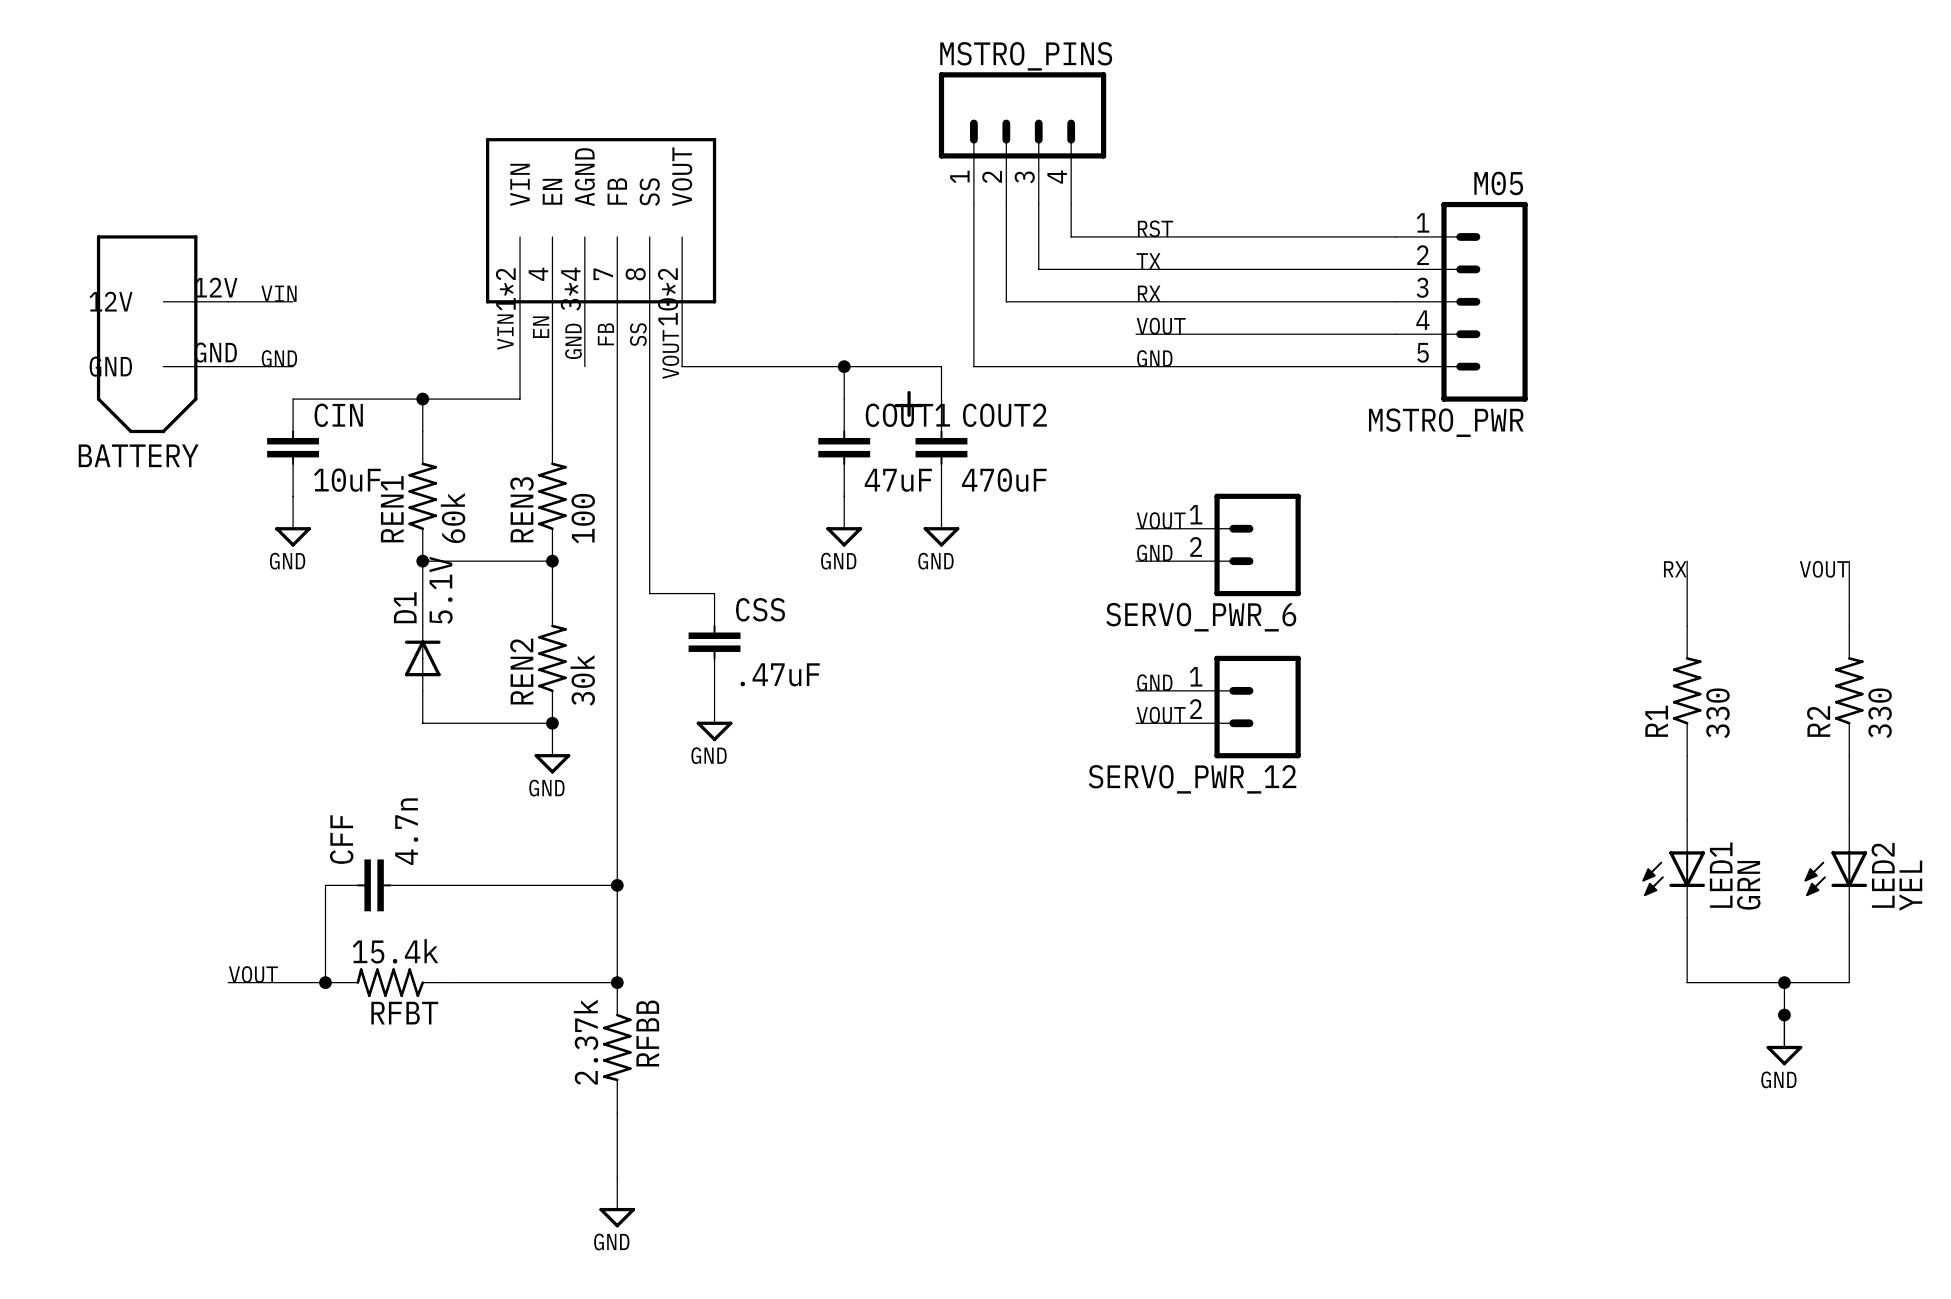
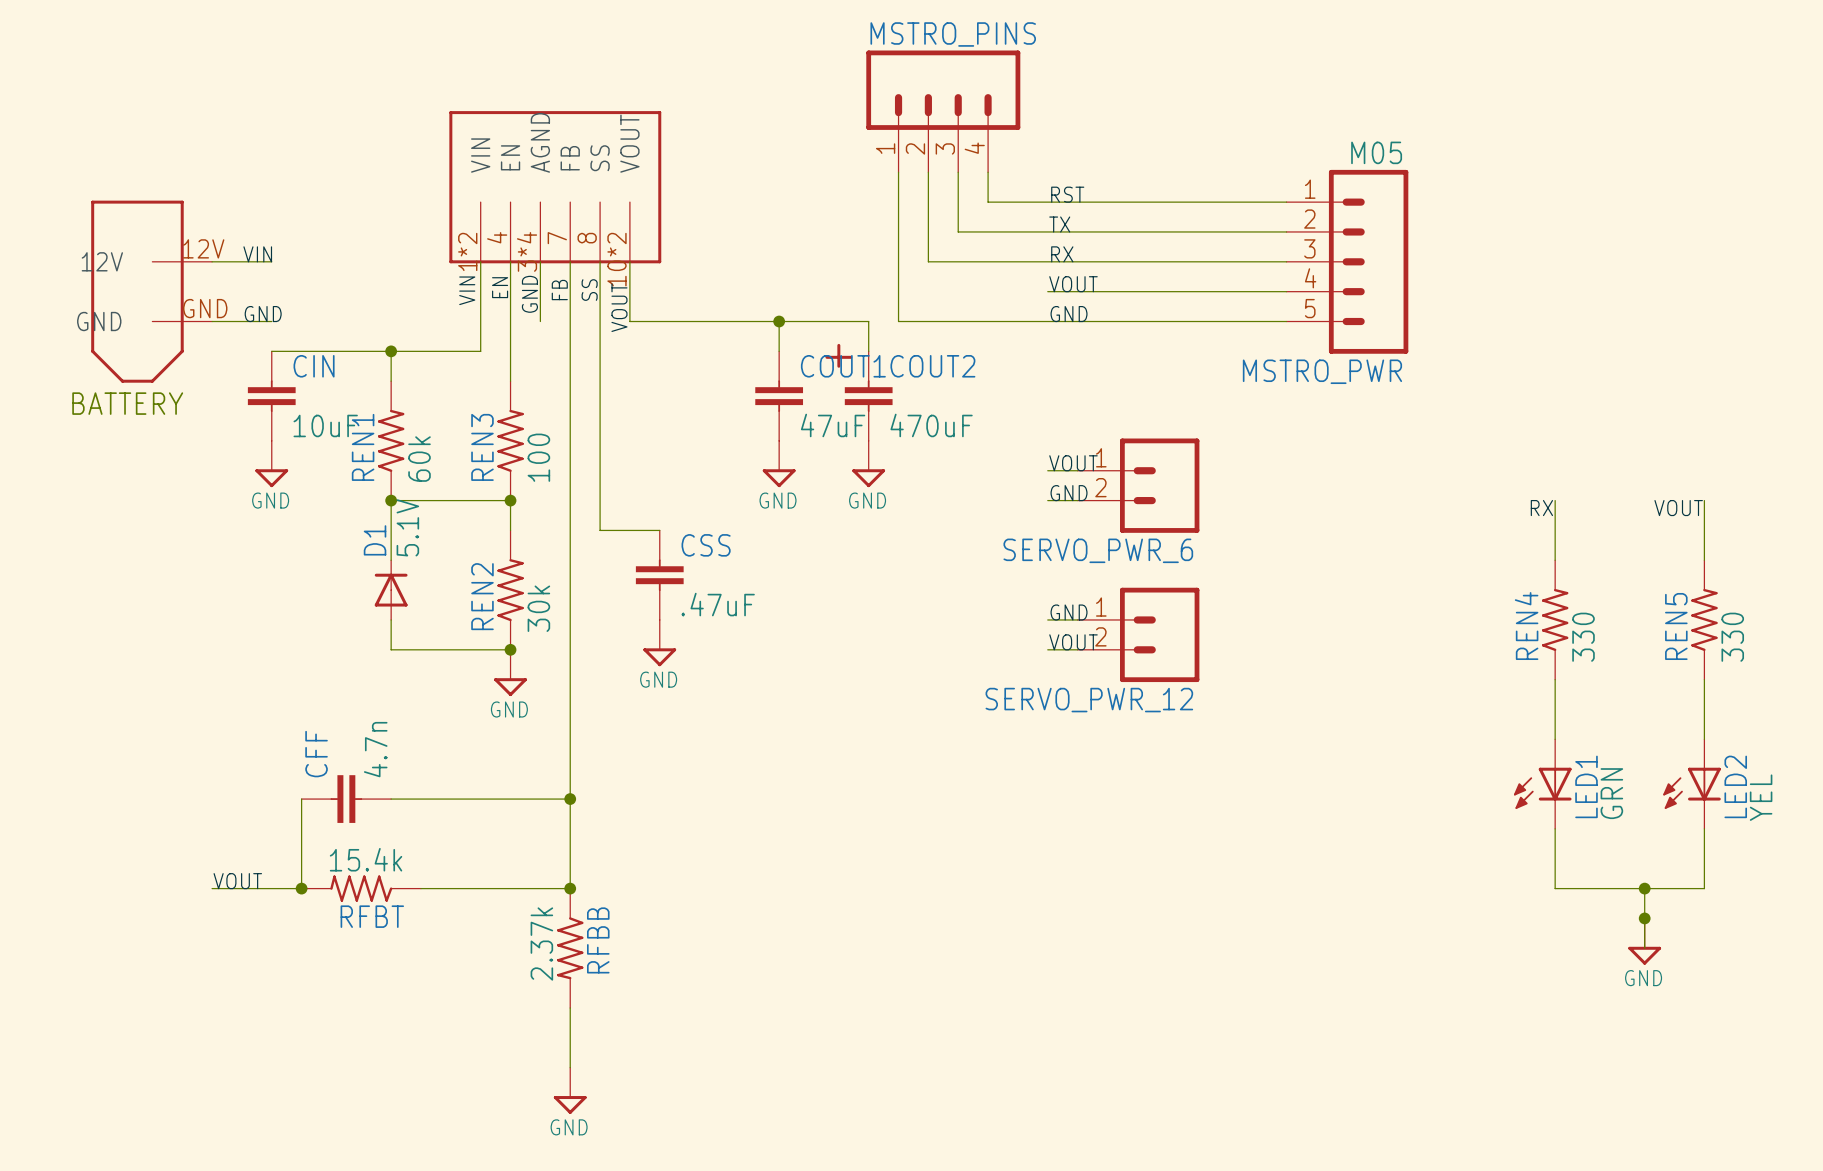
R1 name: R1 (1656, 721) -> REN4 (1526, 626)
R2 name: R2 (1818, 721) -> REN5 (1676, 626)

